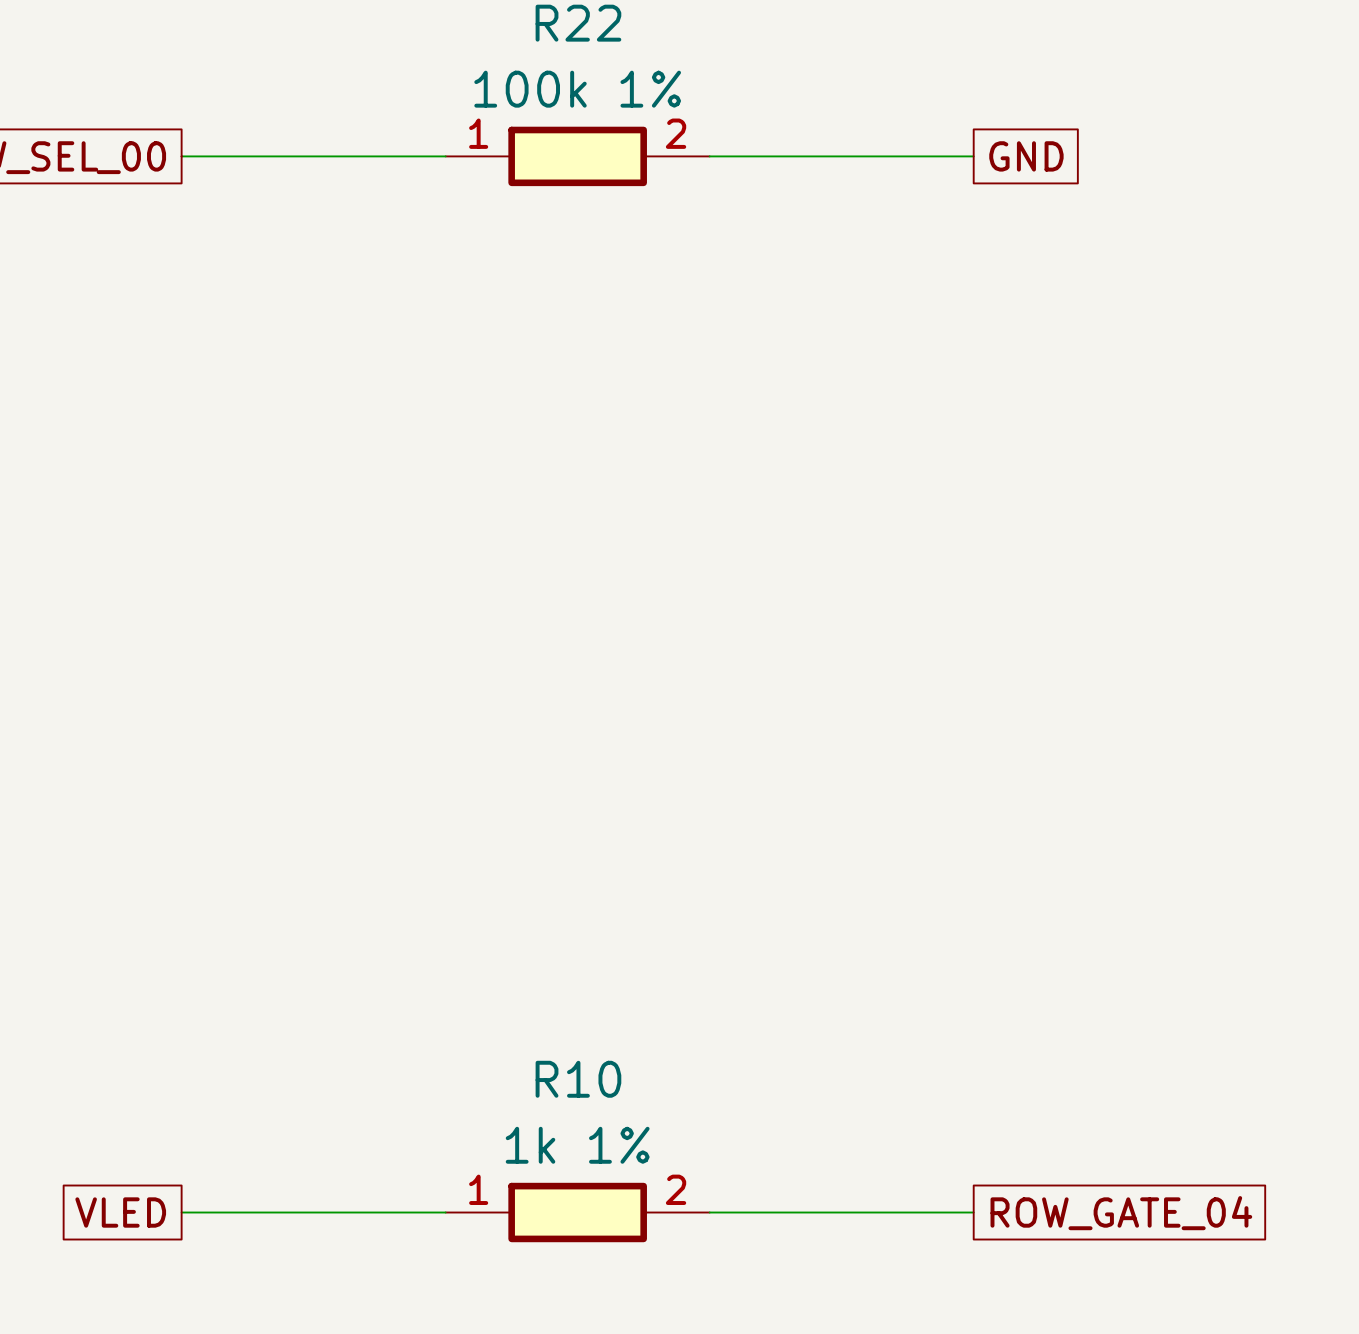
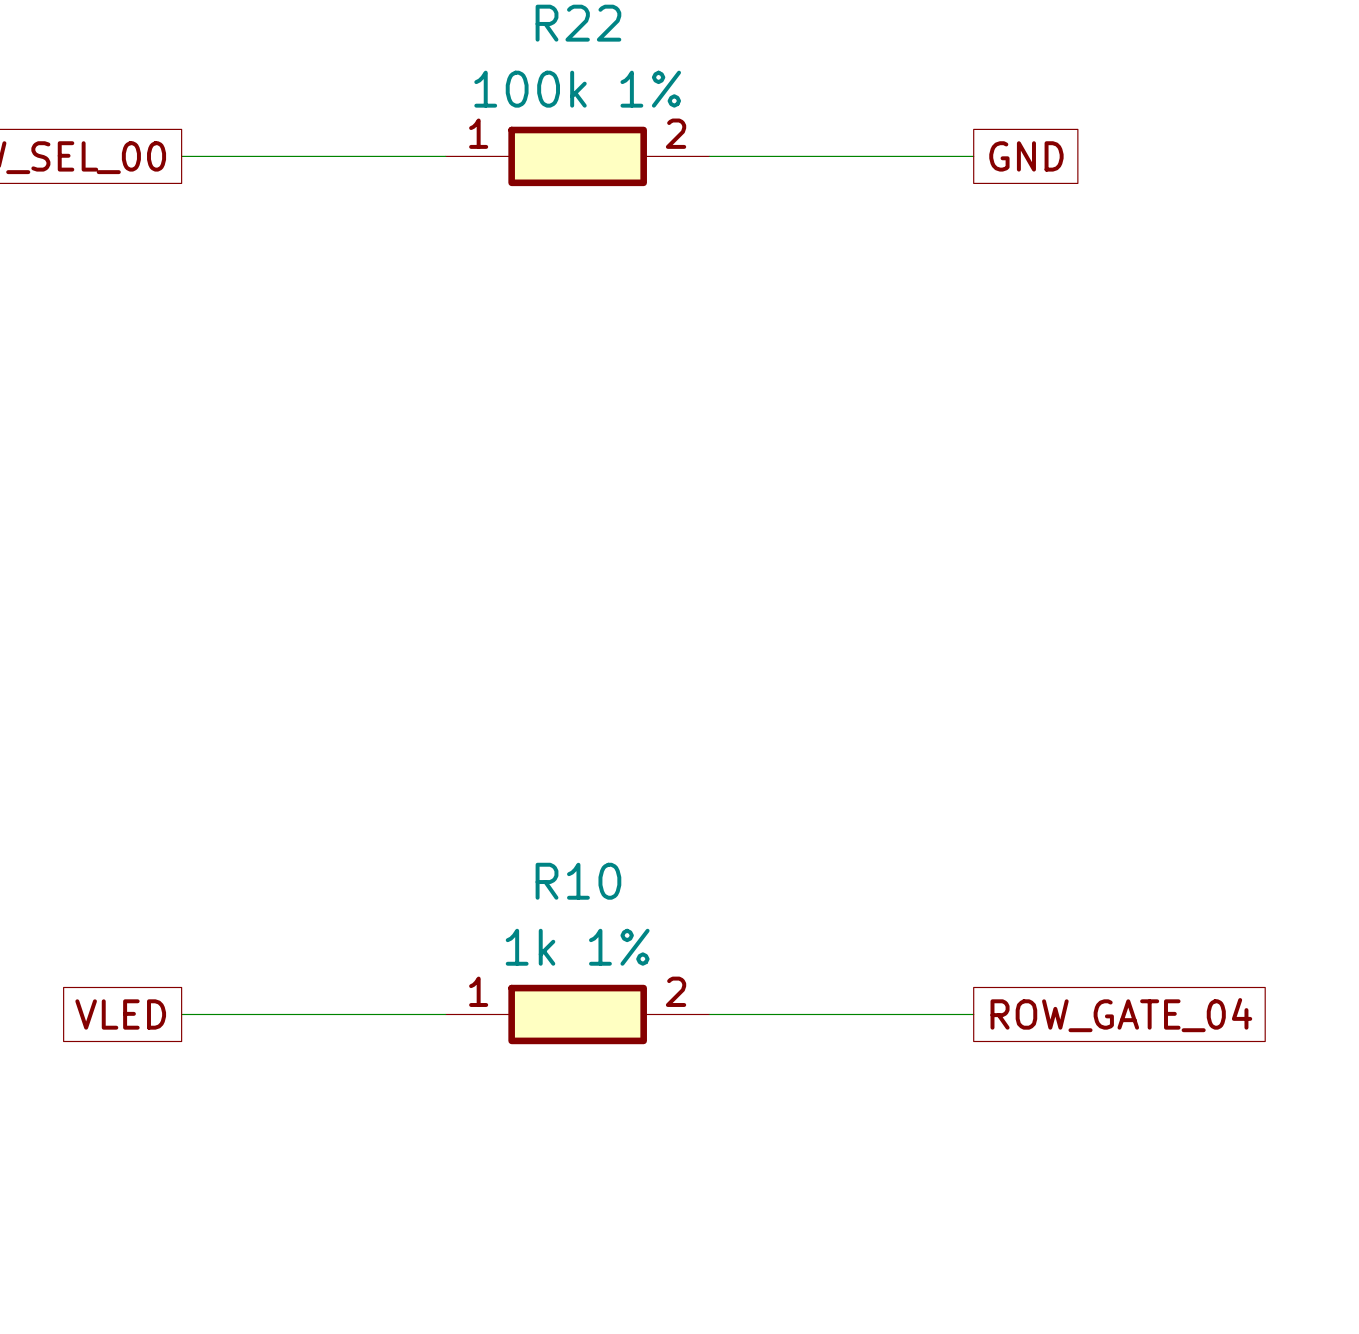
global label position: VLED (120, 1212) -> VLED (120, 1014)
wire: (181, 1212) (445, 1212) -> (181, 1014) (445, 1014)
R10 position: (577, 1212) -> (577, 1014)
wire: (709, 1212) (973, 1212) -> (709, 1014) (973, 1014)
global label position: ROW_GATE_04 (1121, 1213) -> ROW_GATE_04 (1121, 1015)

